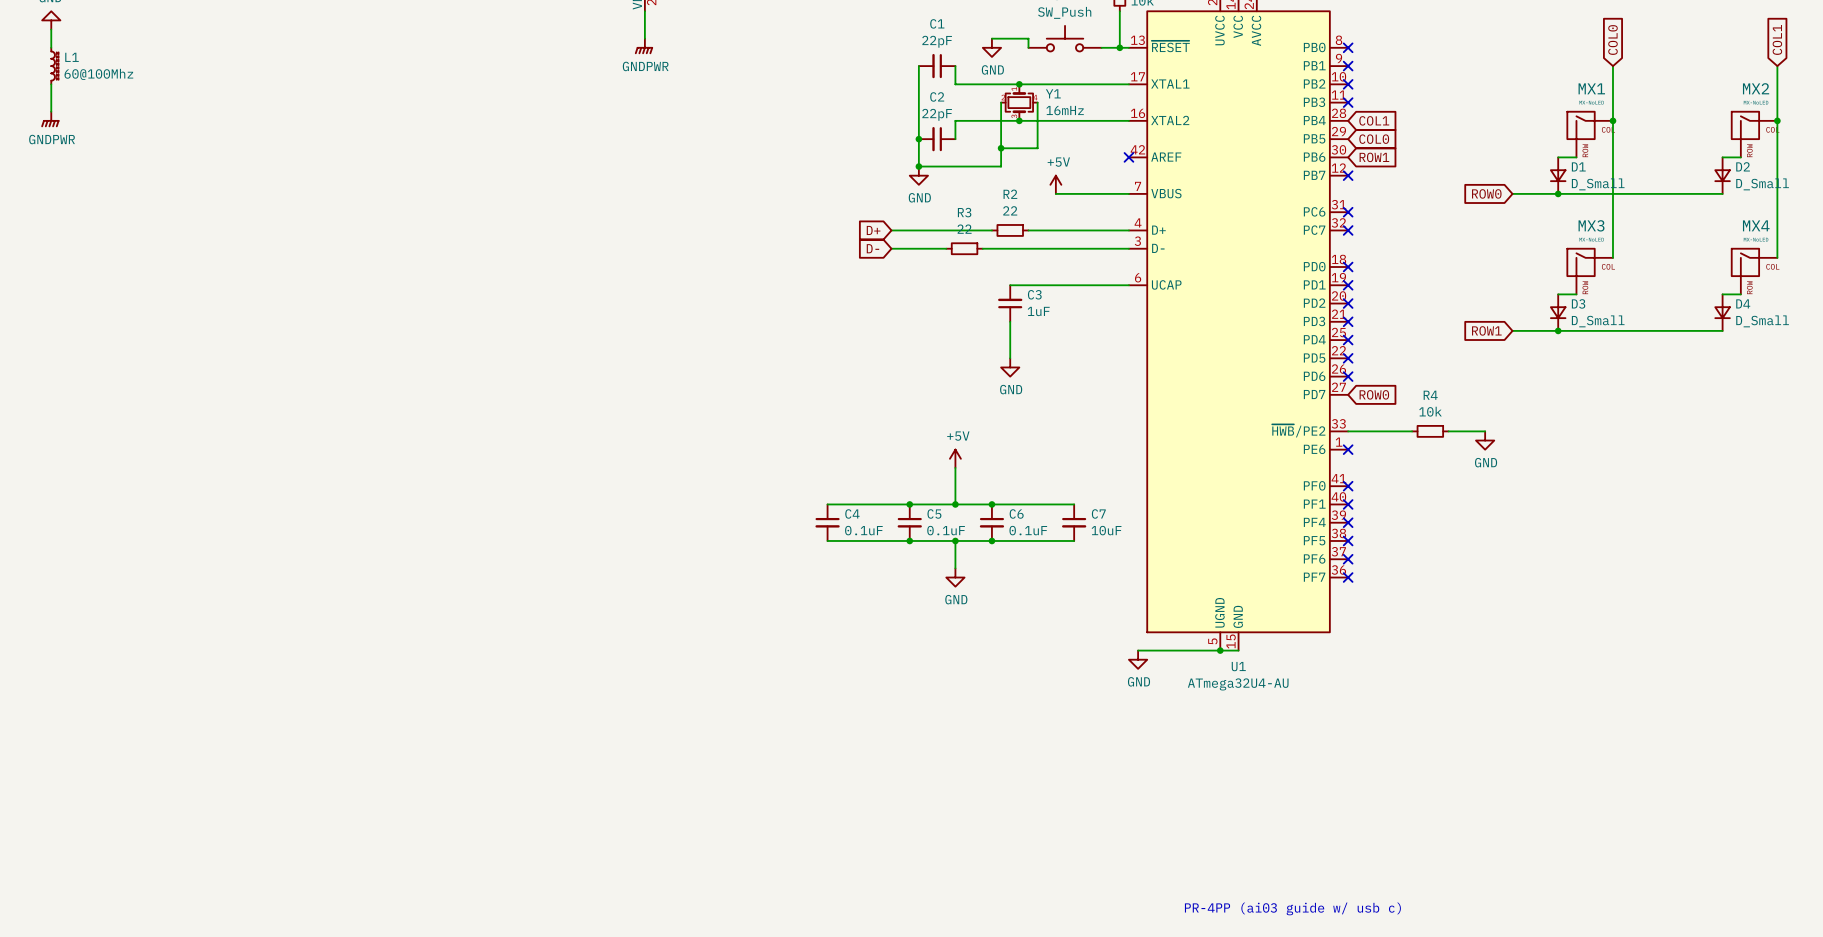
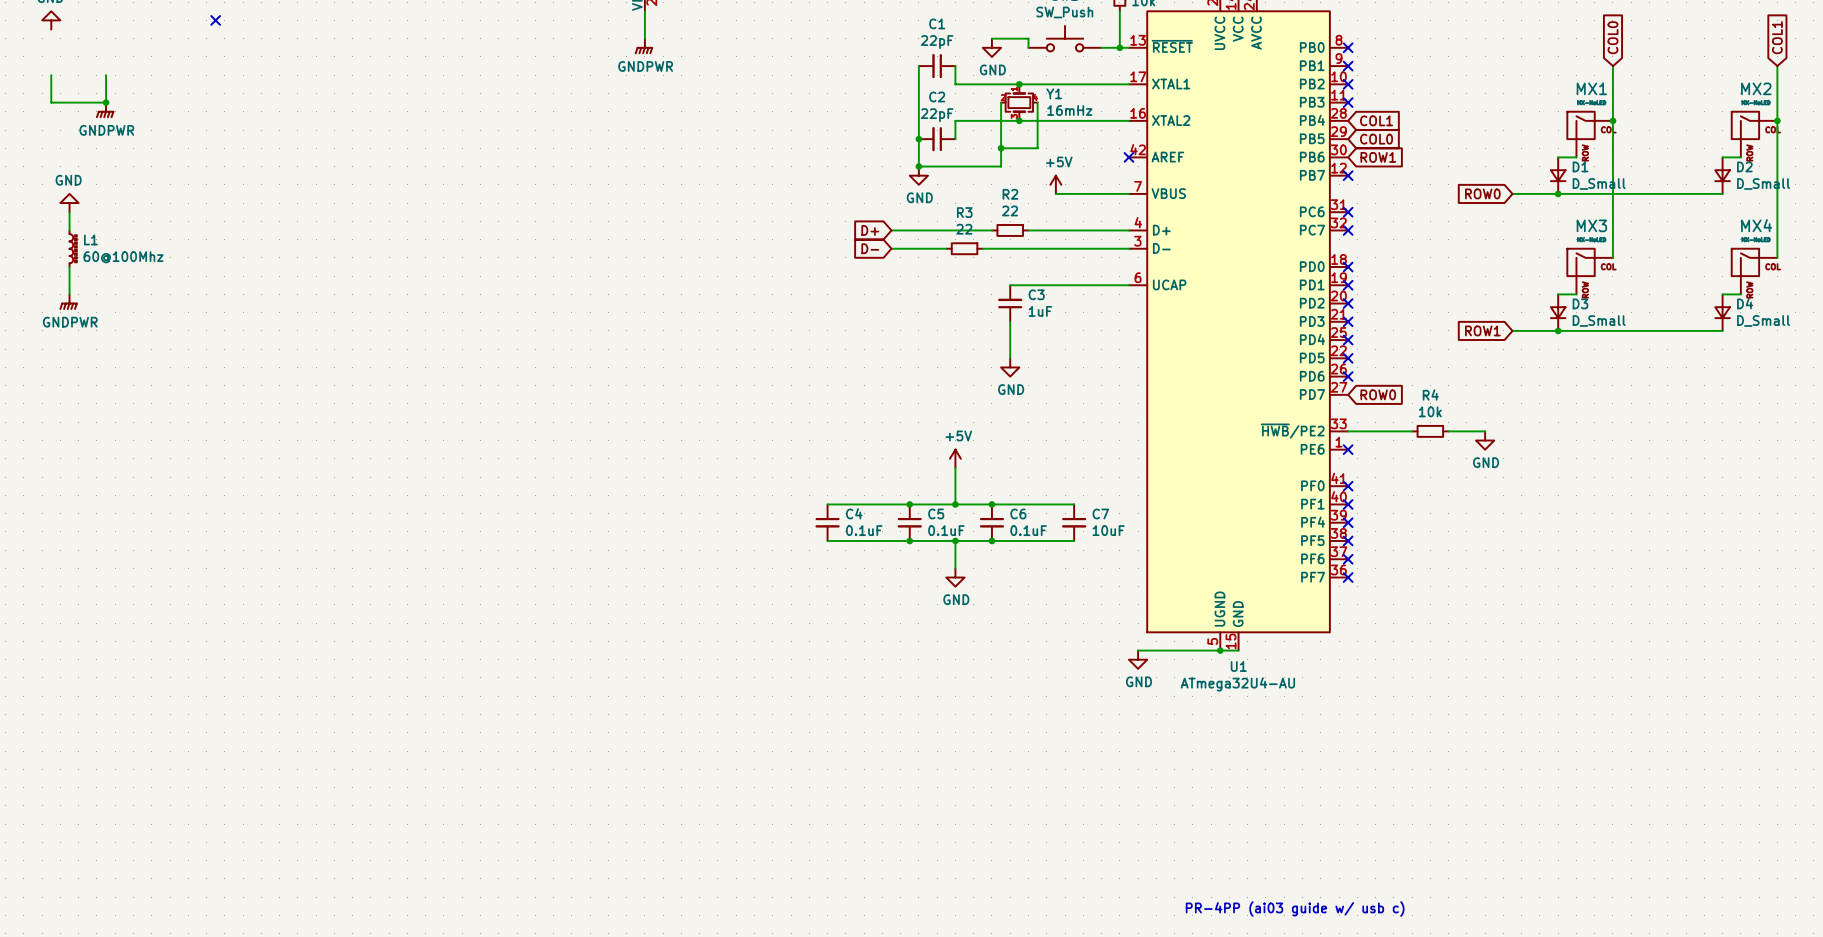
no-connect mark: none -> (215, 20)
wire: (51, 29) (51, 47) -> none
L1 position: (54, 66) -> (73, 248)
wire: (51, 102) (51, 111) -> (51, 102) (106, 102) (106, 75)
junction: none -> (106, 102)
power symbol position: GNDPWR (50, 119) -> GNDPWR (105, 110)
power symbol: none -> GND (69, 203)
wire: none -> (69, 212) (69, 230)
wire: none -> (69, 267) (69, 294)
power symbol: none -> GNDPWR (68, 302)

